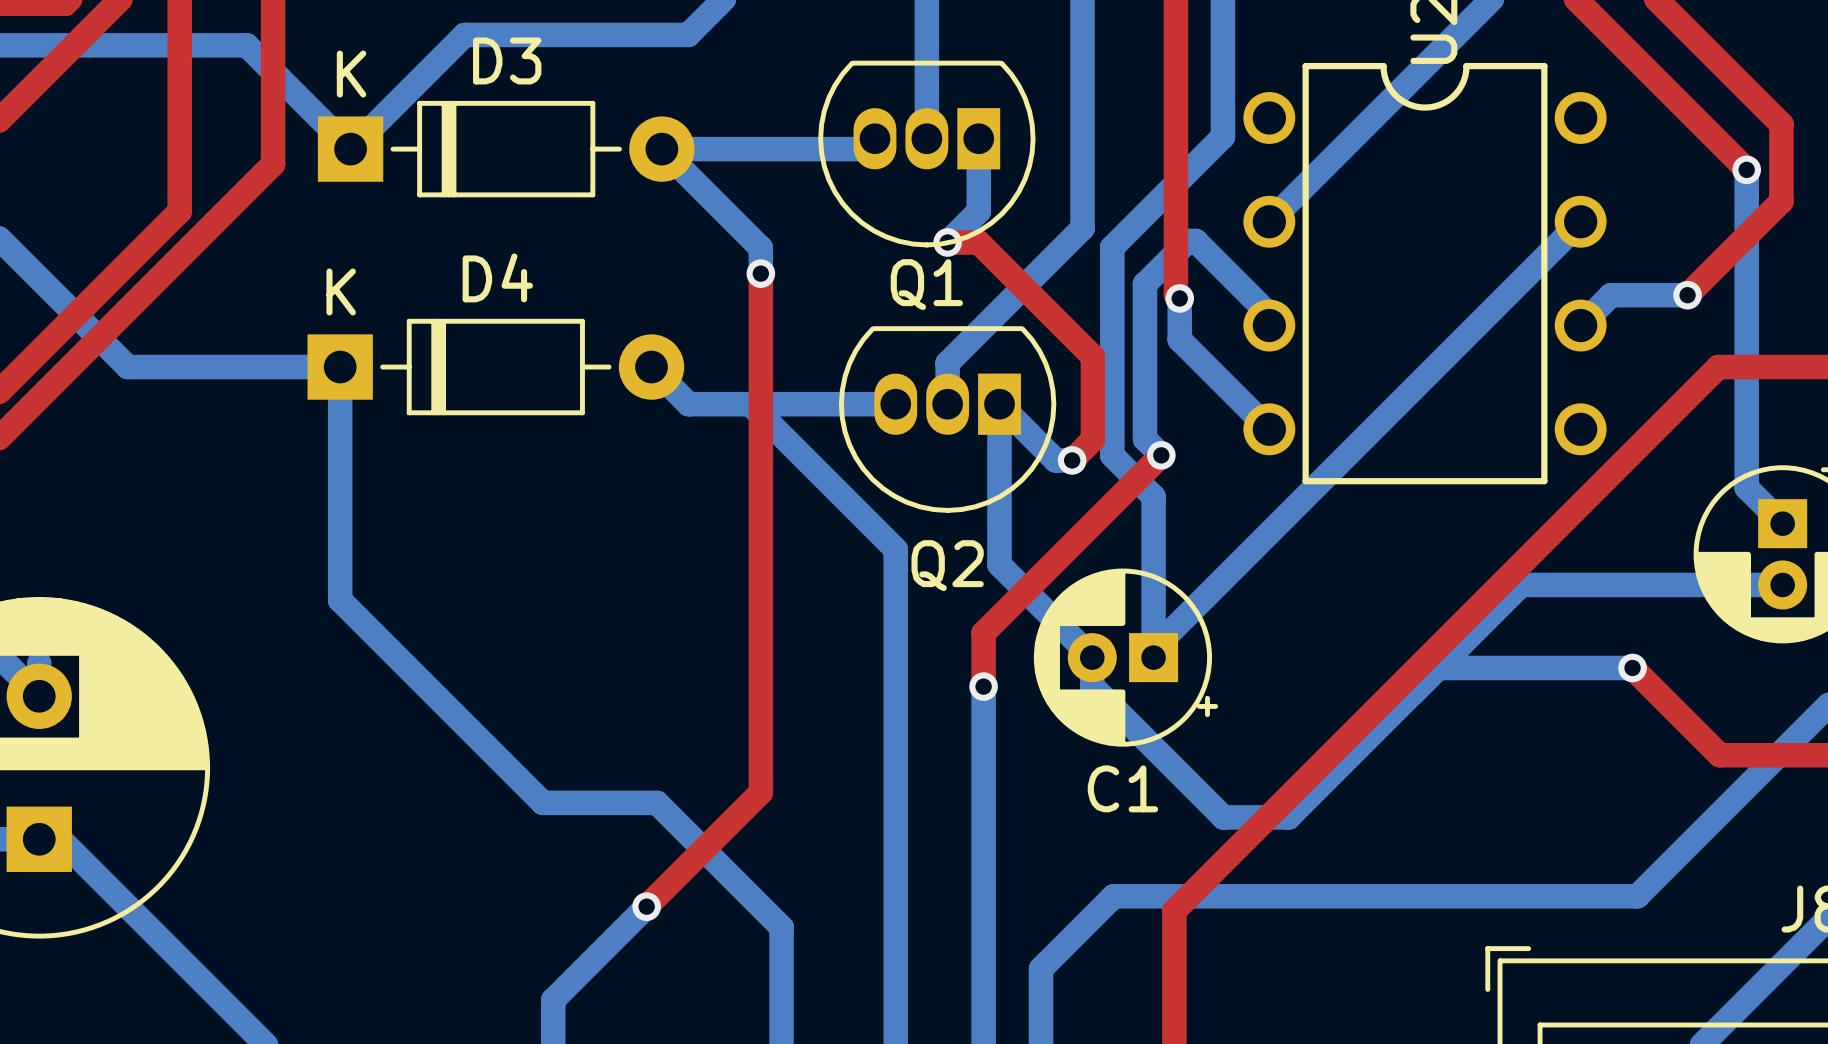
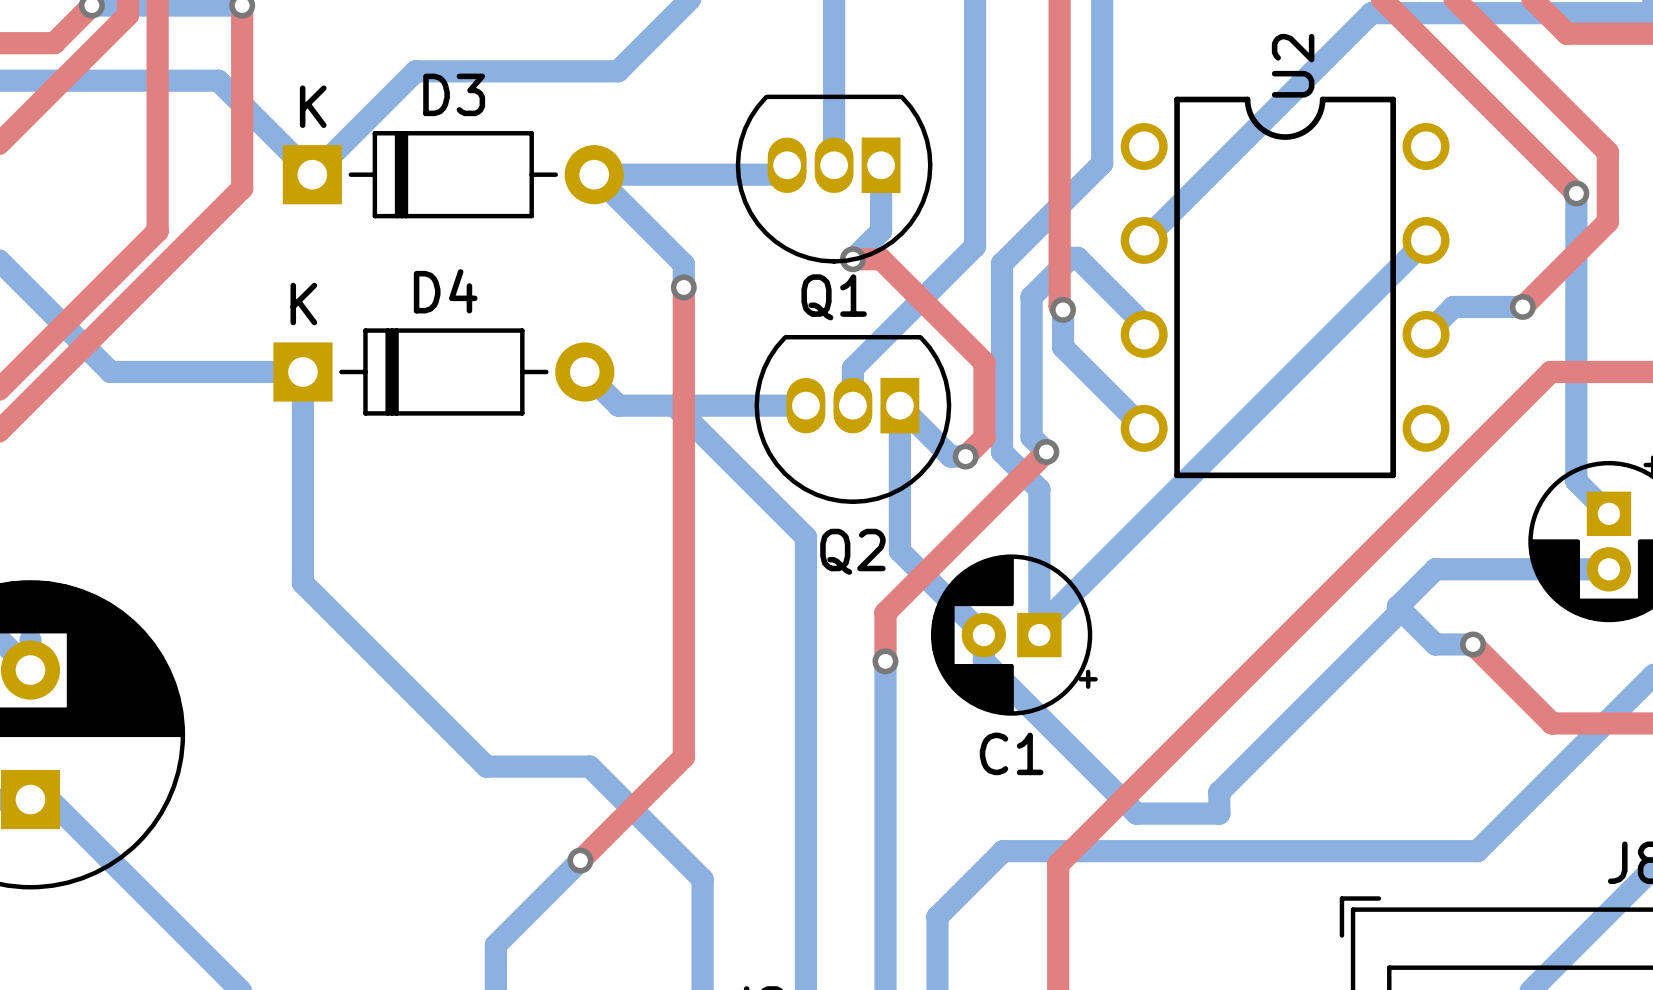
bottom track: (1591, 584) (1521, 584) (1288, 817) (1223, 817) -> (1397, 606) (1397, 613) (1219, 792) (1219, 813) (1136, 813) (1102, 779)
bottom track: none -> (1435, 569) (1397, 606)
bottom track: (1438, 667) (1591, 667) -> (1397, 606) (1435, 644)

